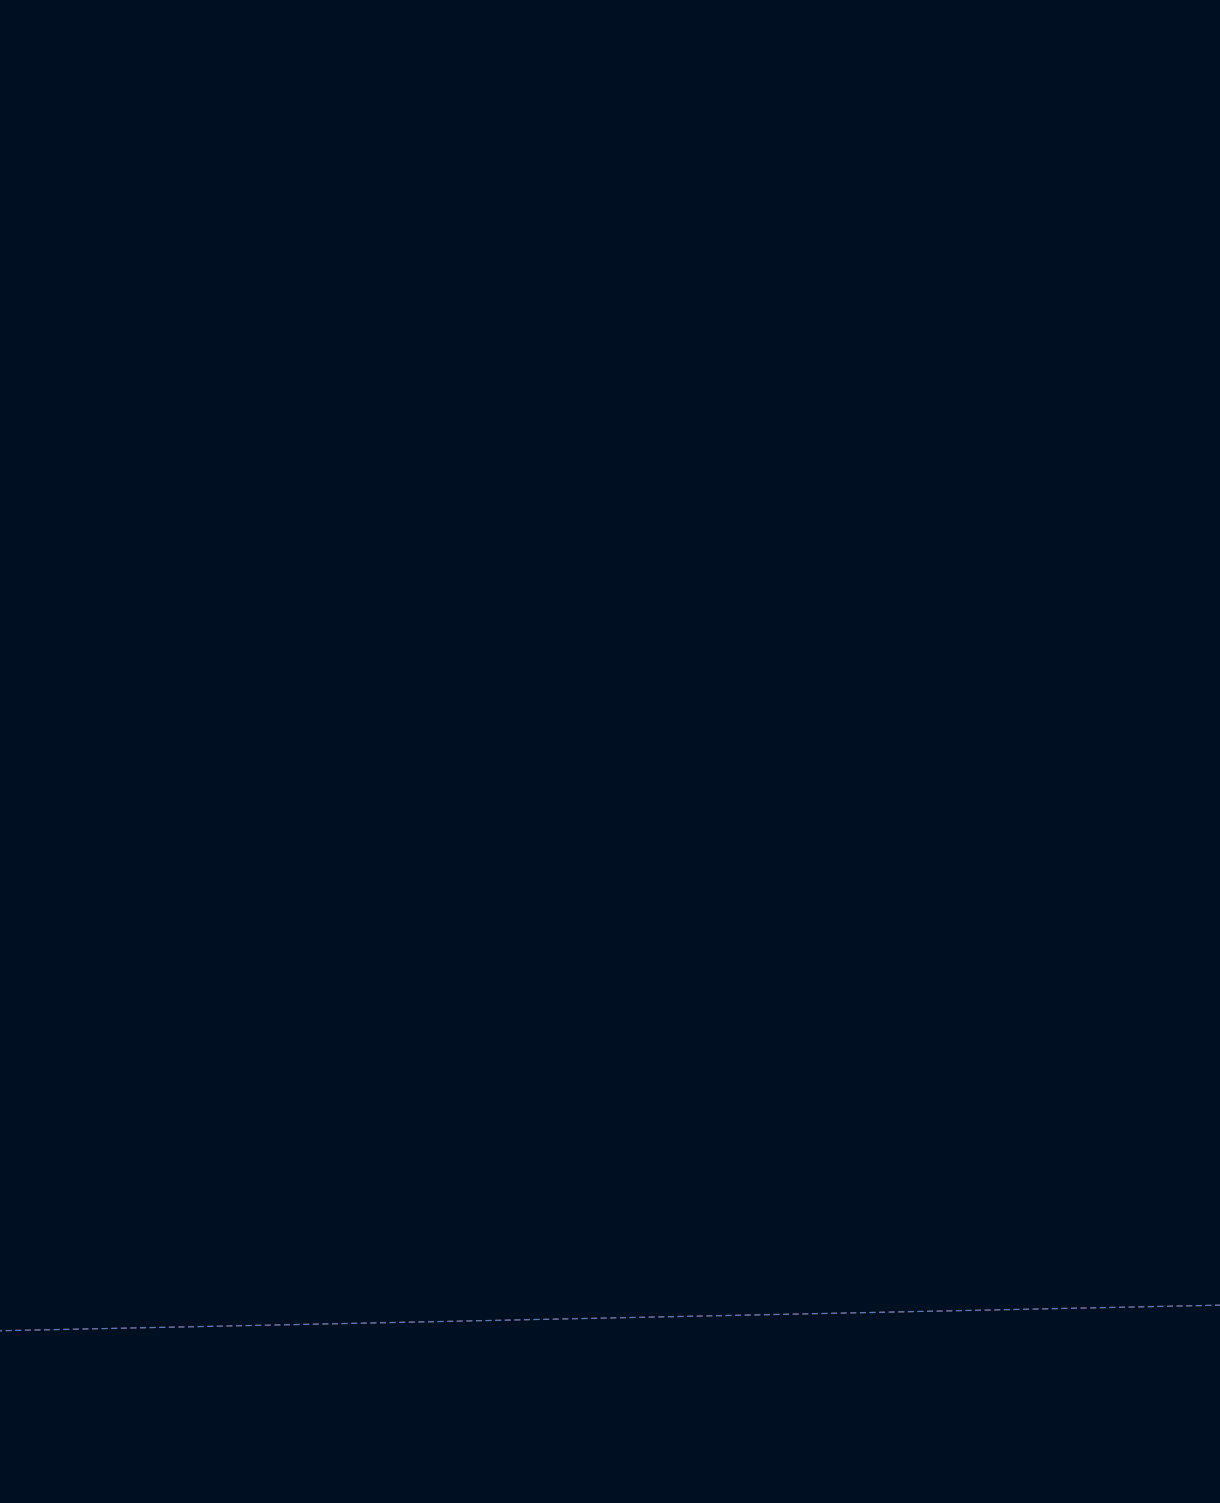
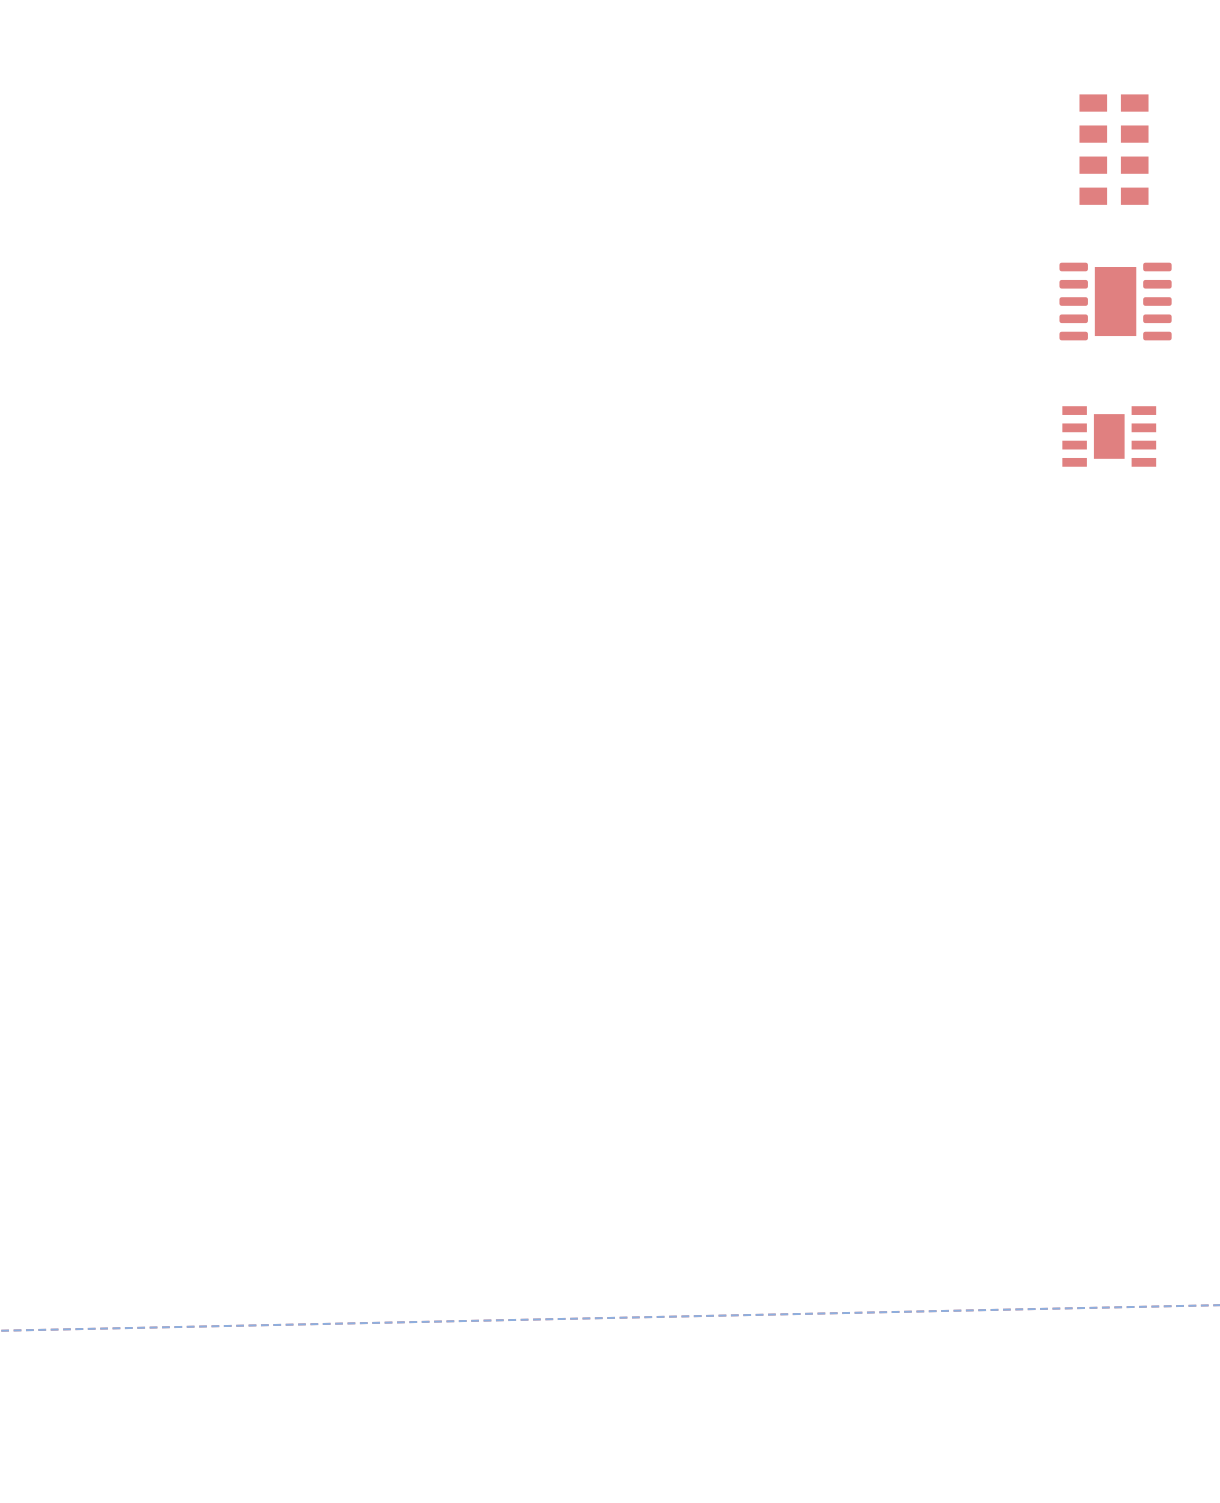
part: none -> (1114, 149)
part: none -> (1115, 301)
part: none -> (1109, 436)

